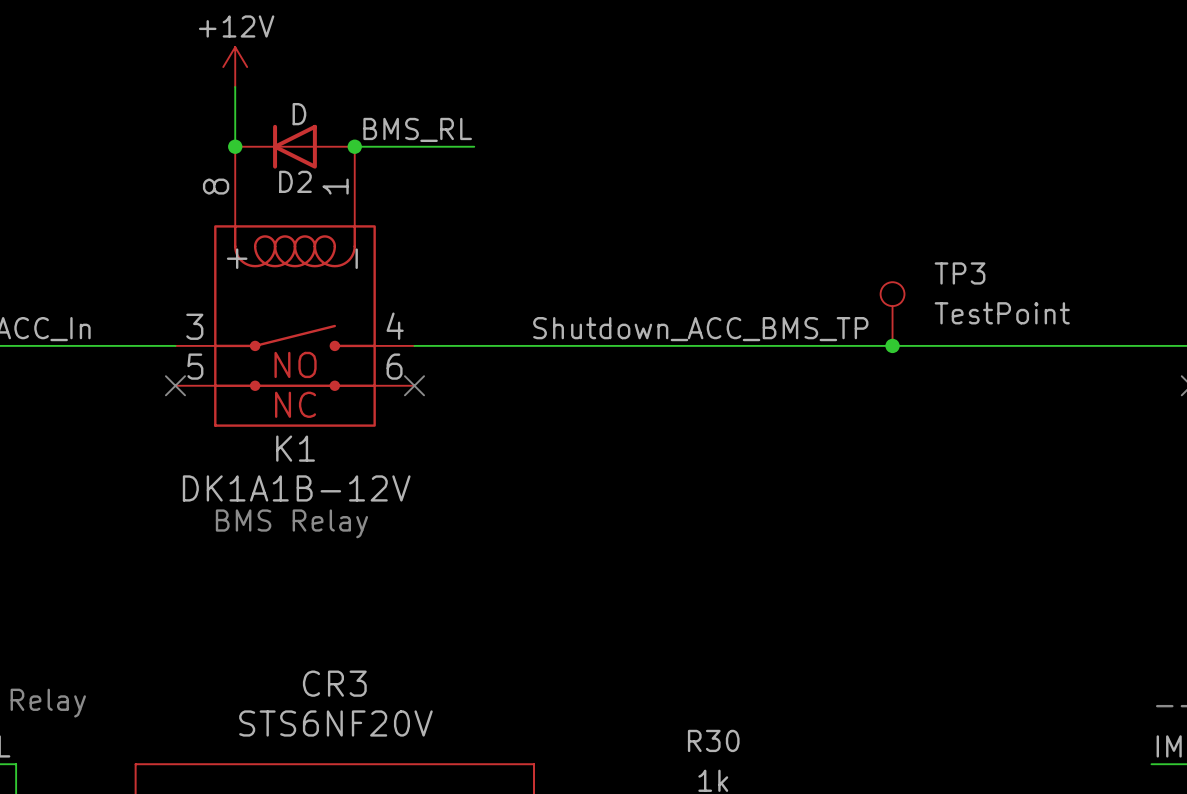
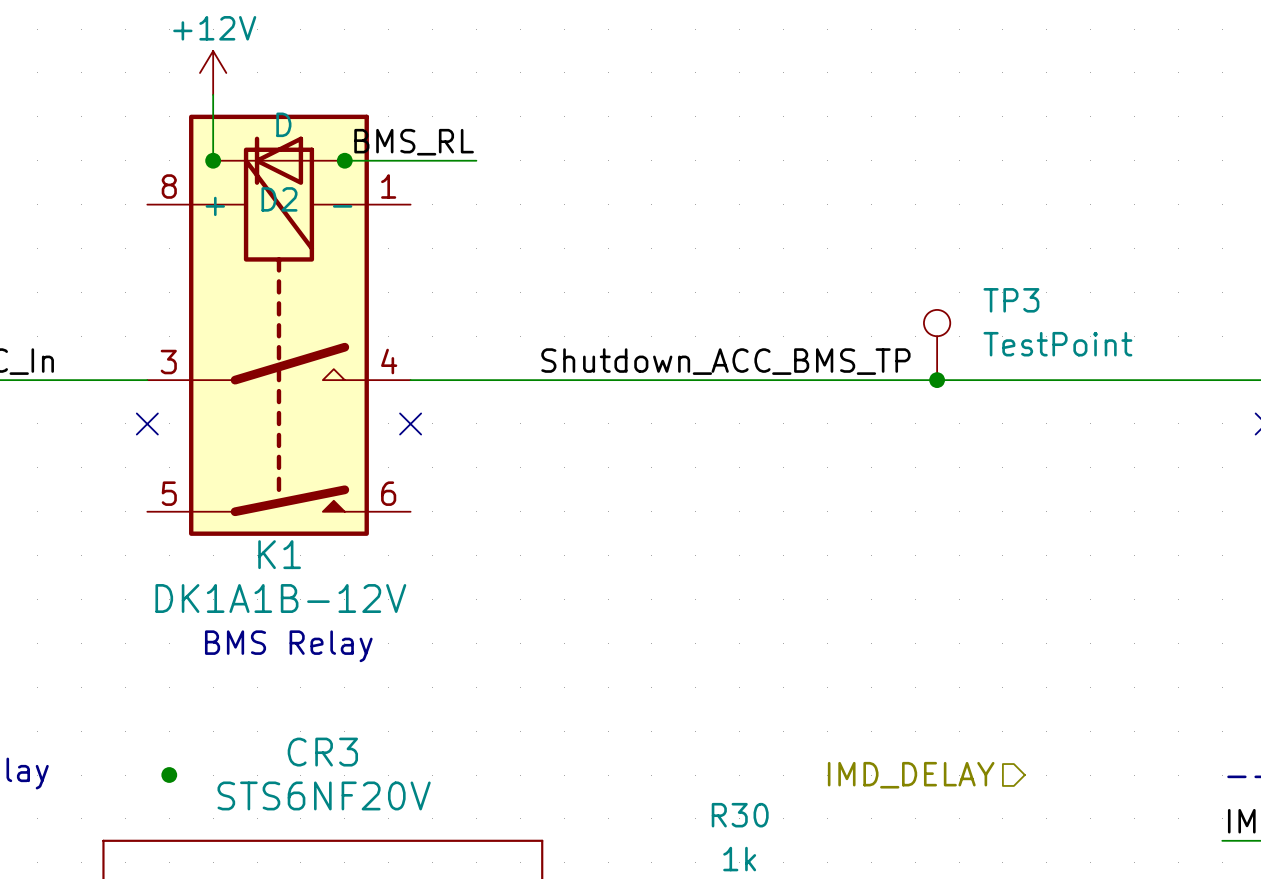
K1 symbol: [175, 146, 415, 427] -> [147, 114, 411, 536]
K1 name position: K1 (295, 448) -> K1 (279, 554)
K1 value position: DK1A1B-12V (296, 488) -> DK1A1B-12V (280, 598)
text position: BMS Relay (291, 523) -> BMS Relay (288, 646)
junction: none -> (169, 775)
hierarchical label: none -> IMD_DELAY (911, 775)

